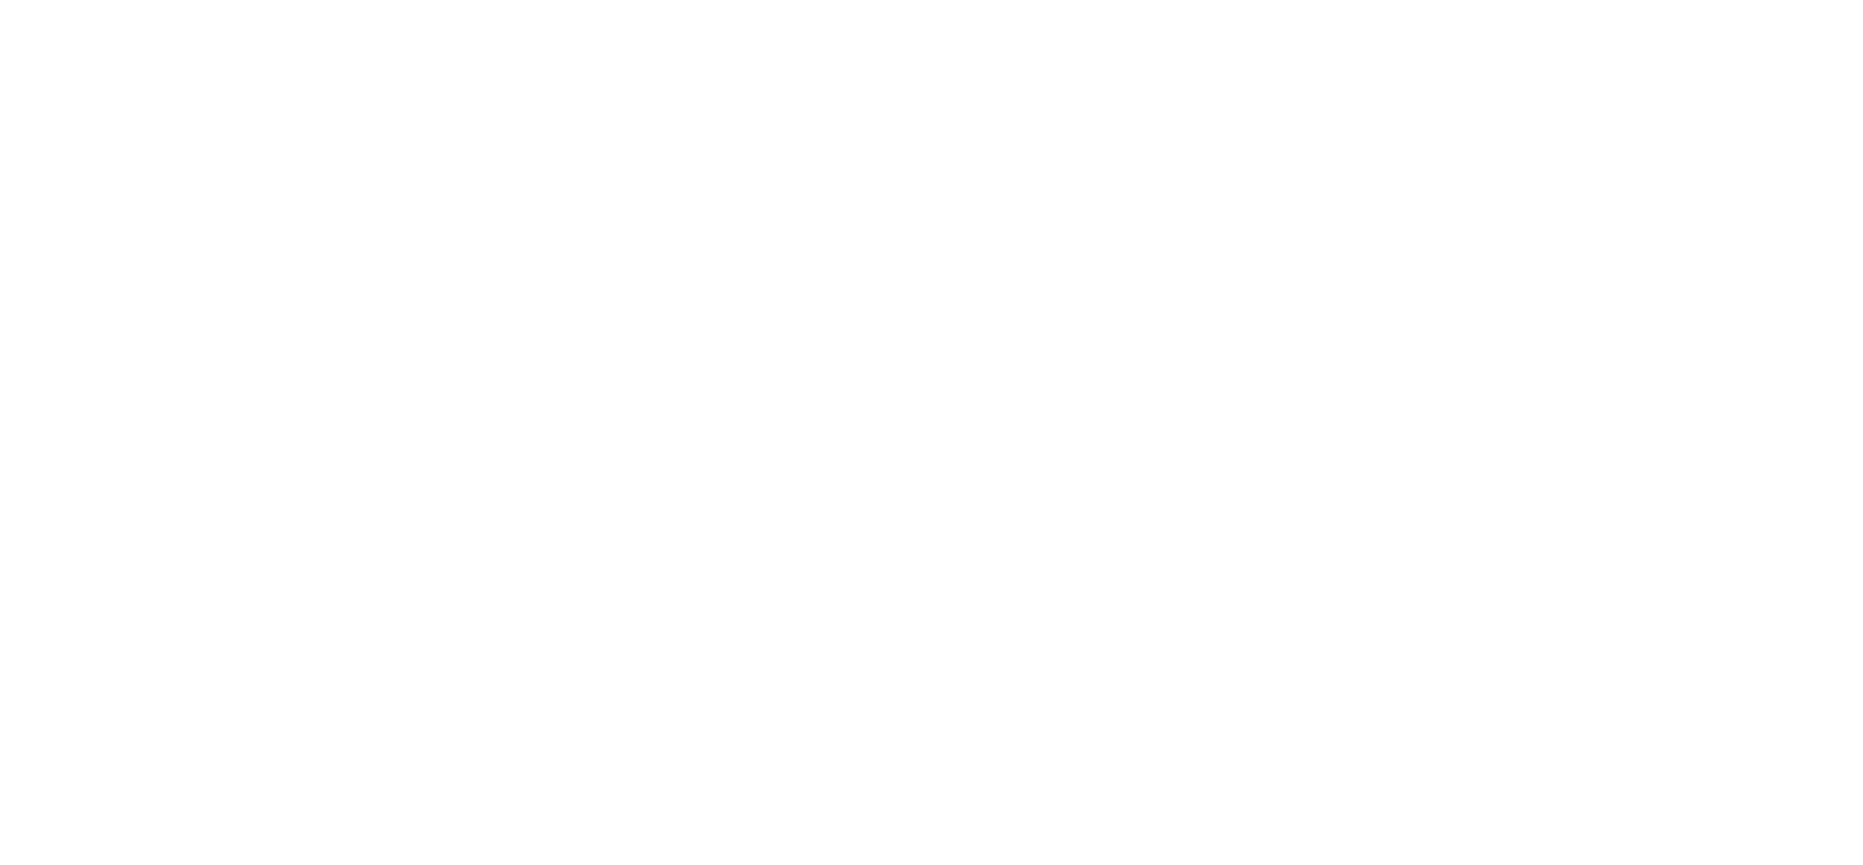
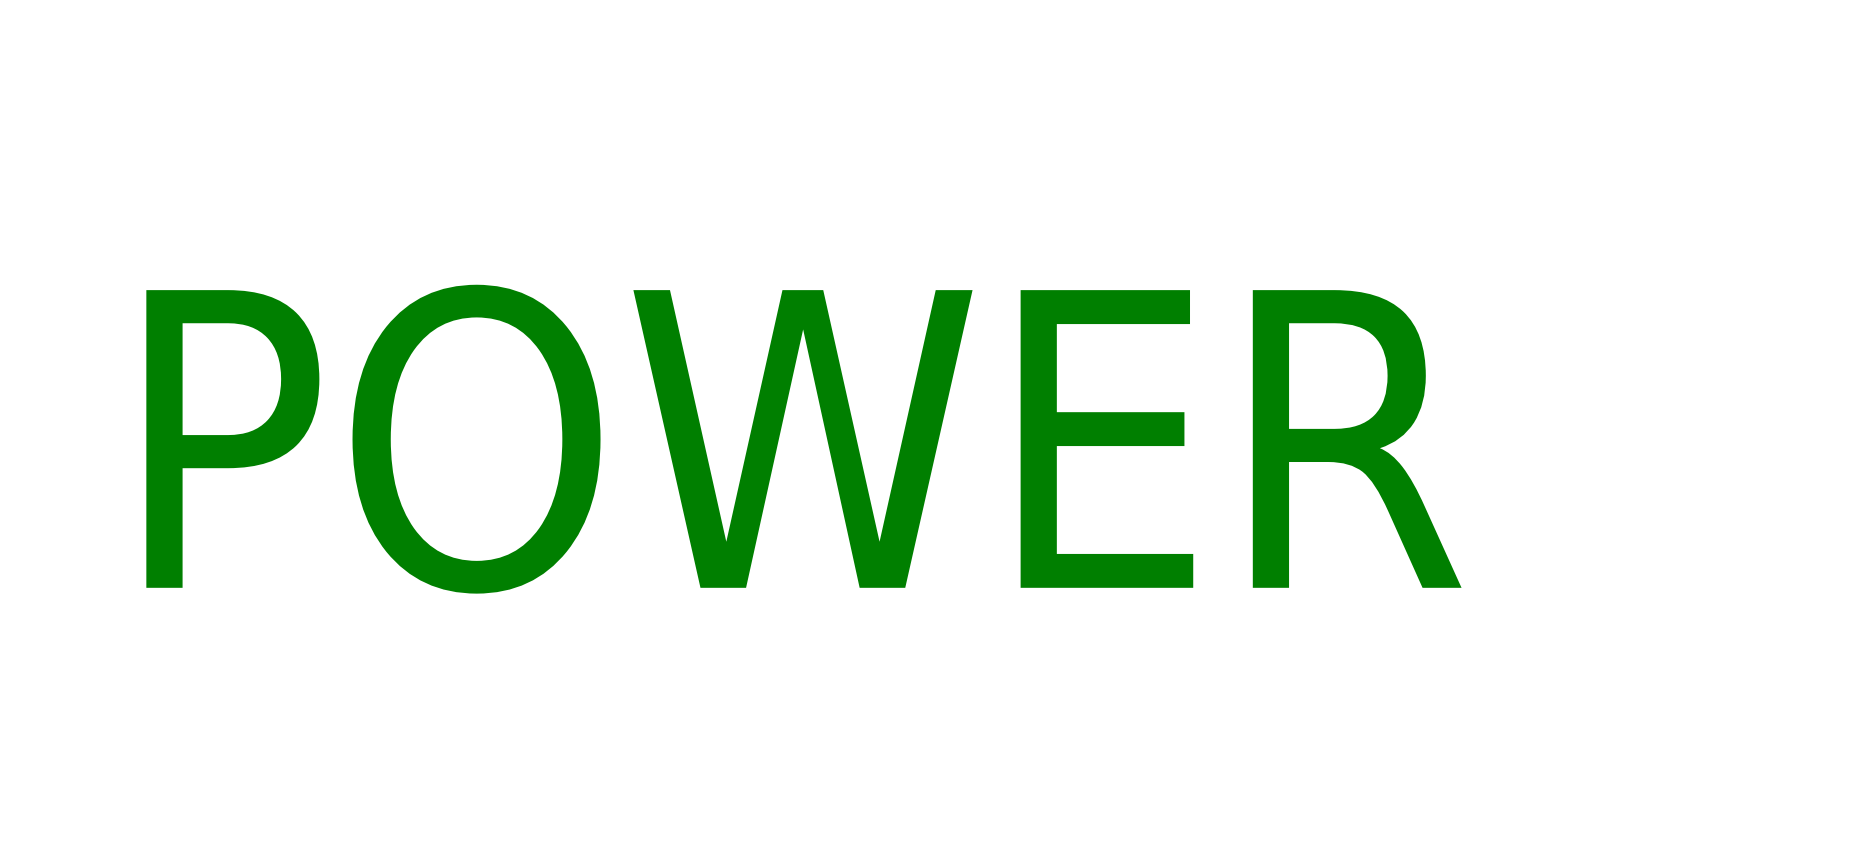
text: none -> POWER (803, 439)

